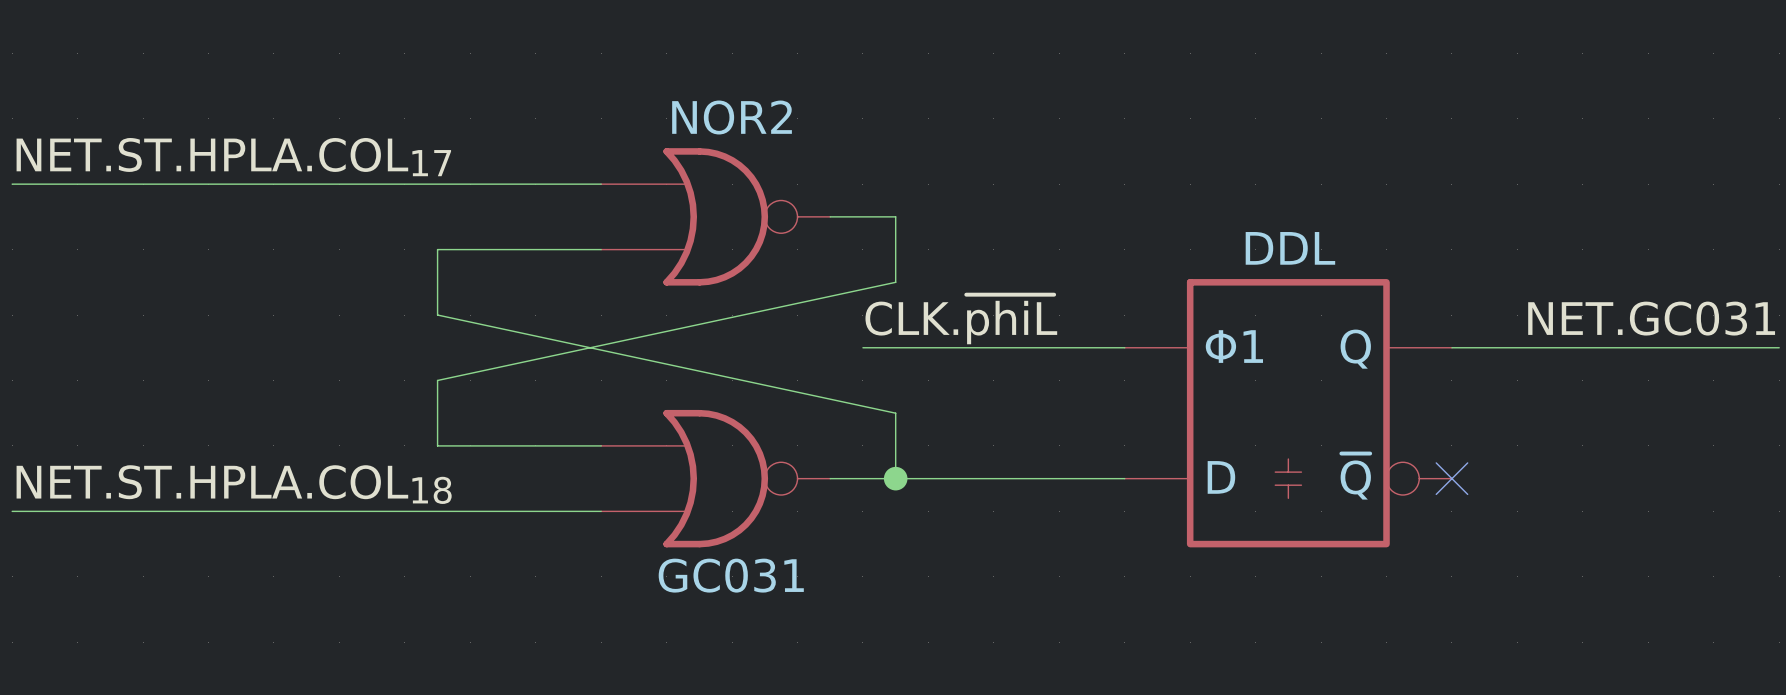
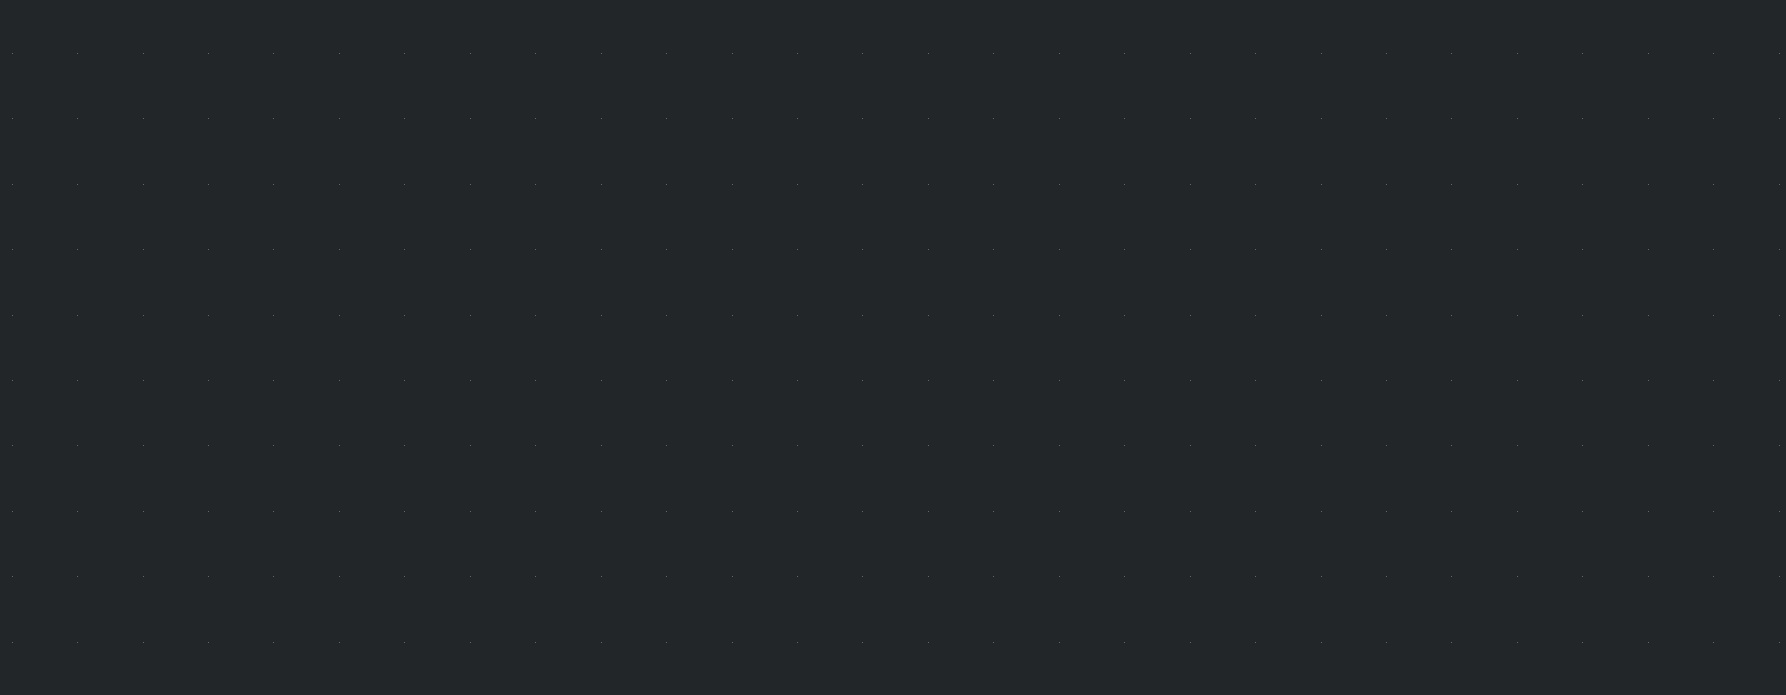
label: NET.ST.HPLA.COL17 (233, 157) -> none
wire: (12, 184) (601, 184) -> none
part: NOR2 (715, 216) -> none
wire: (830, 216) (895, 216) (895, 282) (437, 380) (437, 445) (601, 445) -> none
wire: (601, 249) (437, 249) (437, 315) (895, 413) (895, 478) -> none
label: NET.GC031 (1651, 318) -> none
label: CLK.~{phiL} (961, 319) -> none
wire: (862, 347) (1124, 347) -> none
wire: (1451, 347) (1779, 347) -> none
part: DDL (1288, 413) -> none
part: GC031 (715, 478) -> none
wire: (830, 478) (1124, 478) -> none
junction: (895, 478) -> none
no-connect mark: (1451, 478) -> none
label: NET.ST.HPLA.COL18 (234, 484) -> none
wire: (12, 511) (601, 511) -> none

